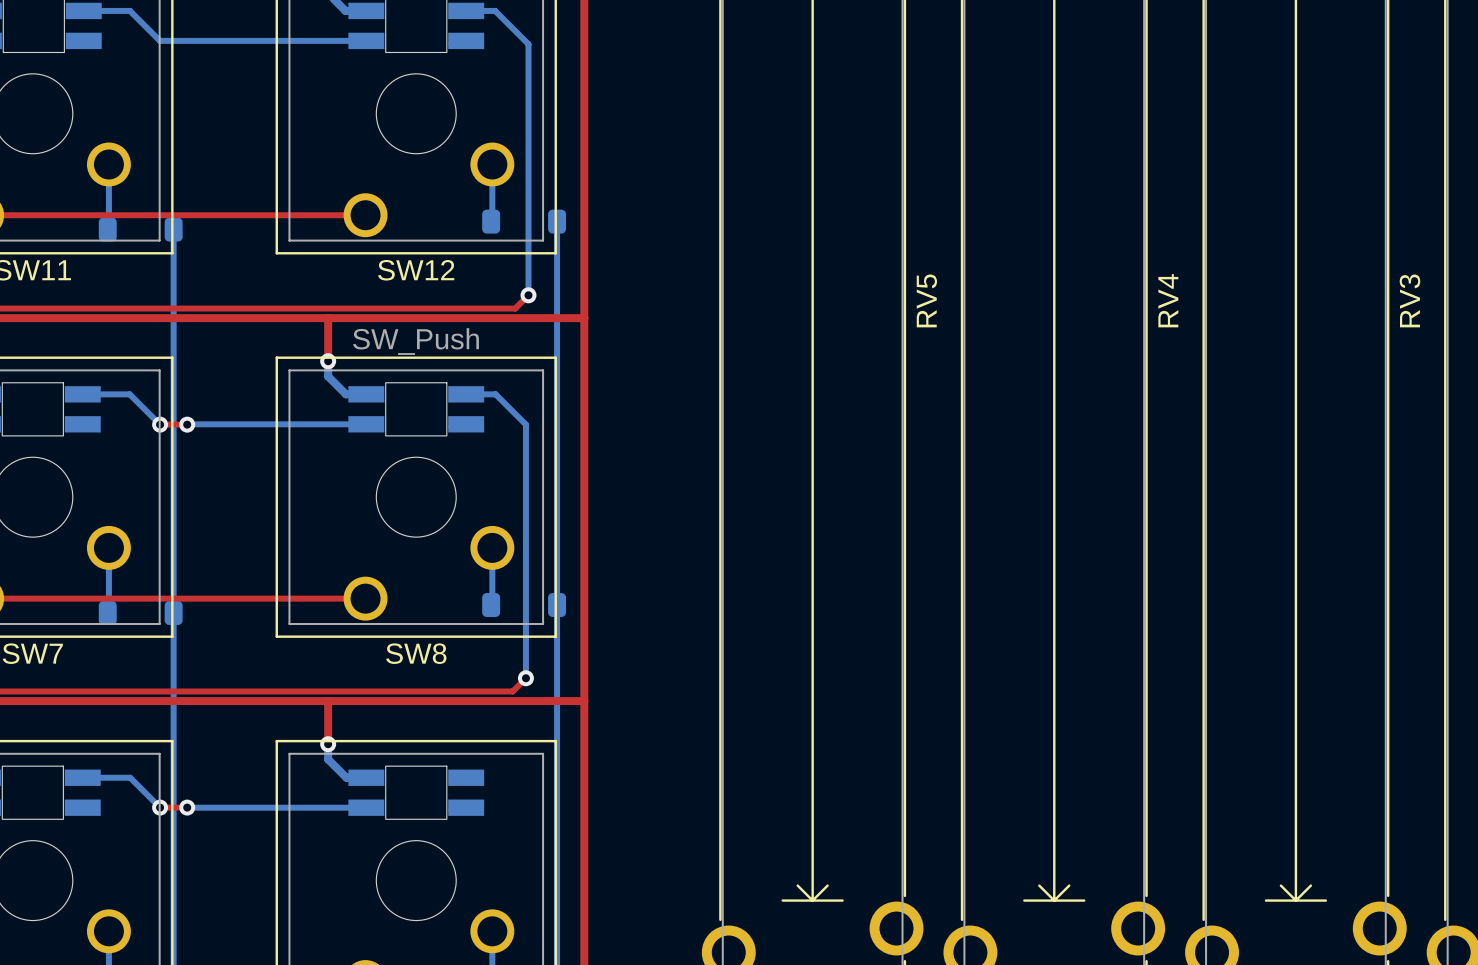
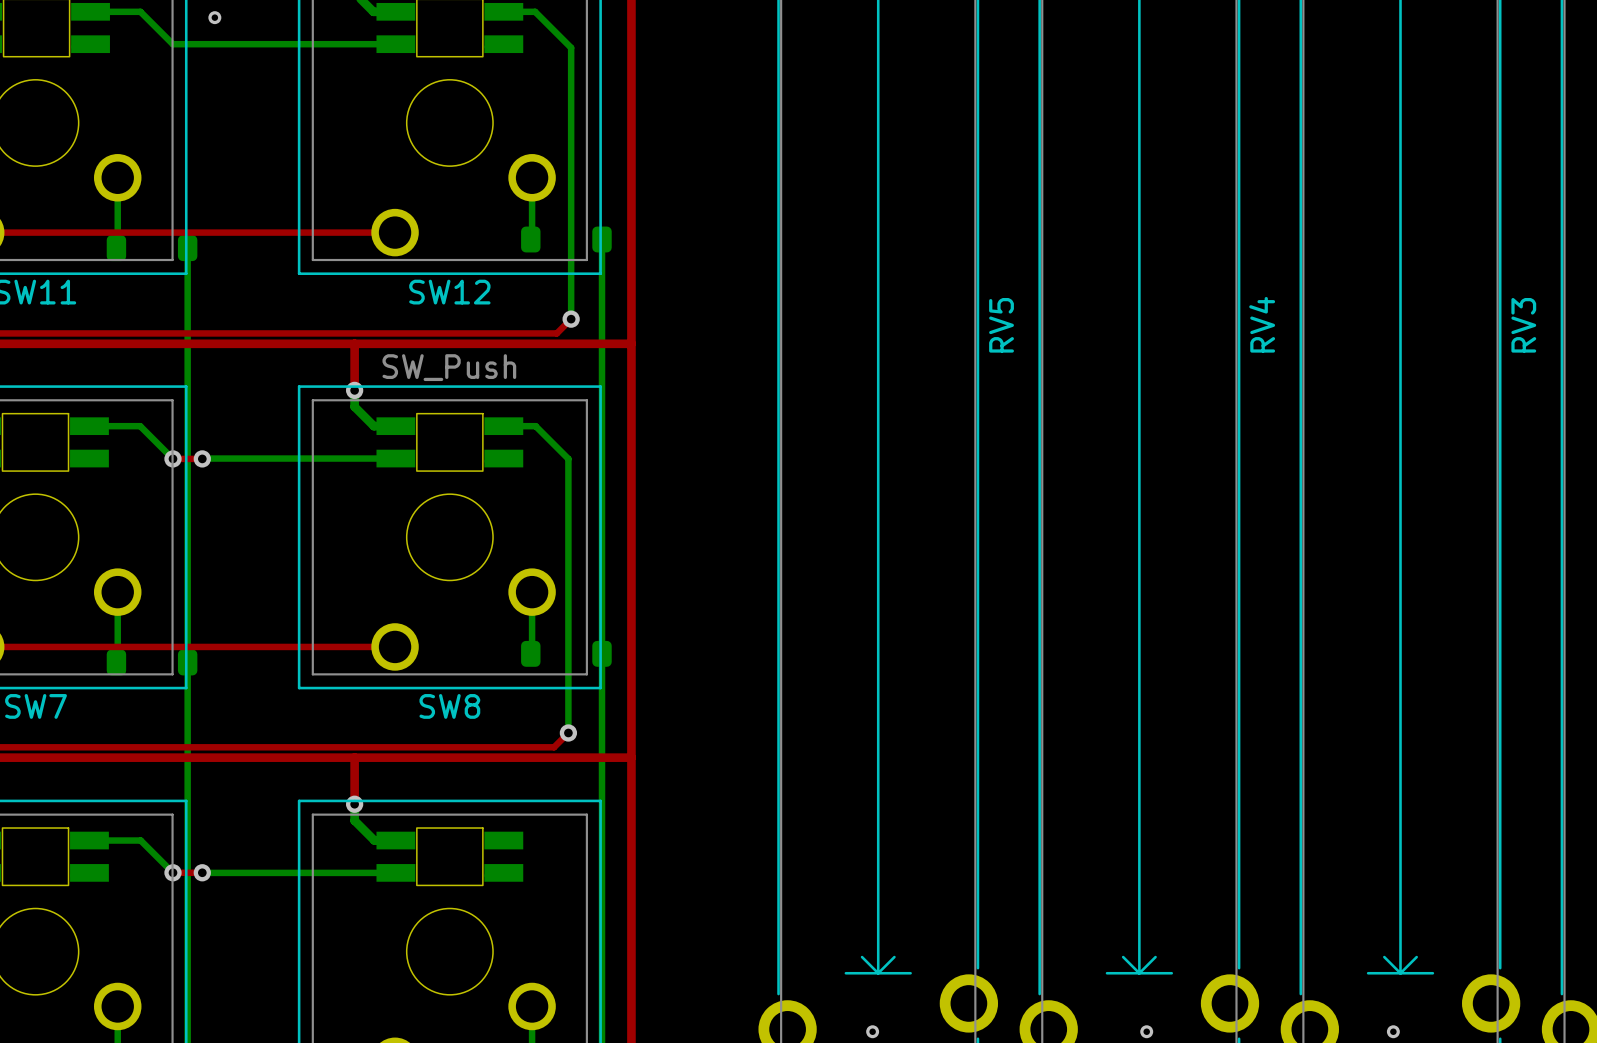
via: none -> (214, 17)
via: none -> (872, 1031)
via: none -> (1146, 1031)
via: none -> (1393, 1031)

